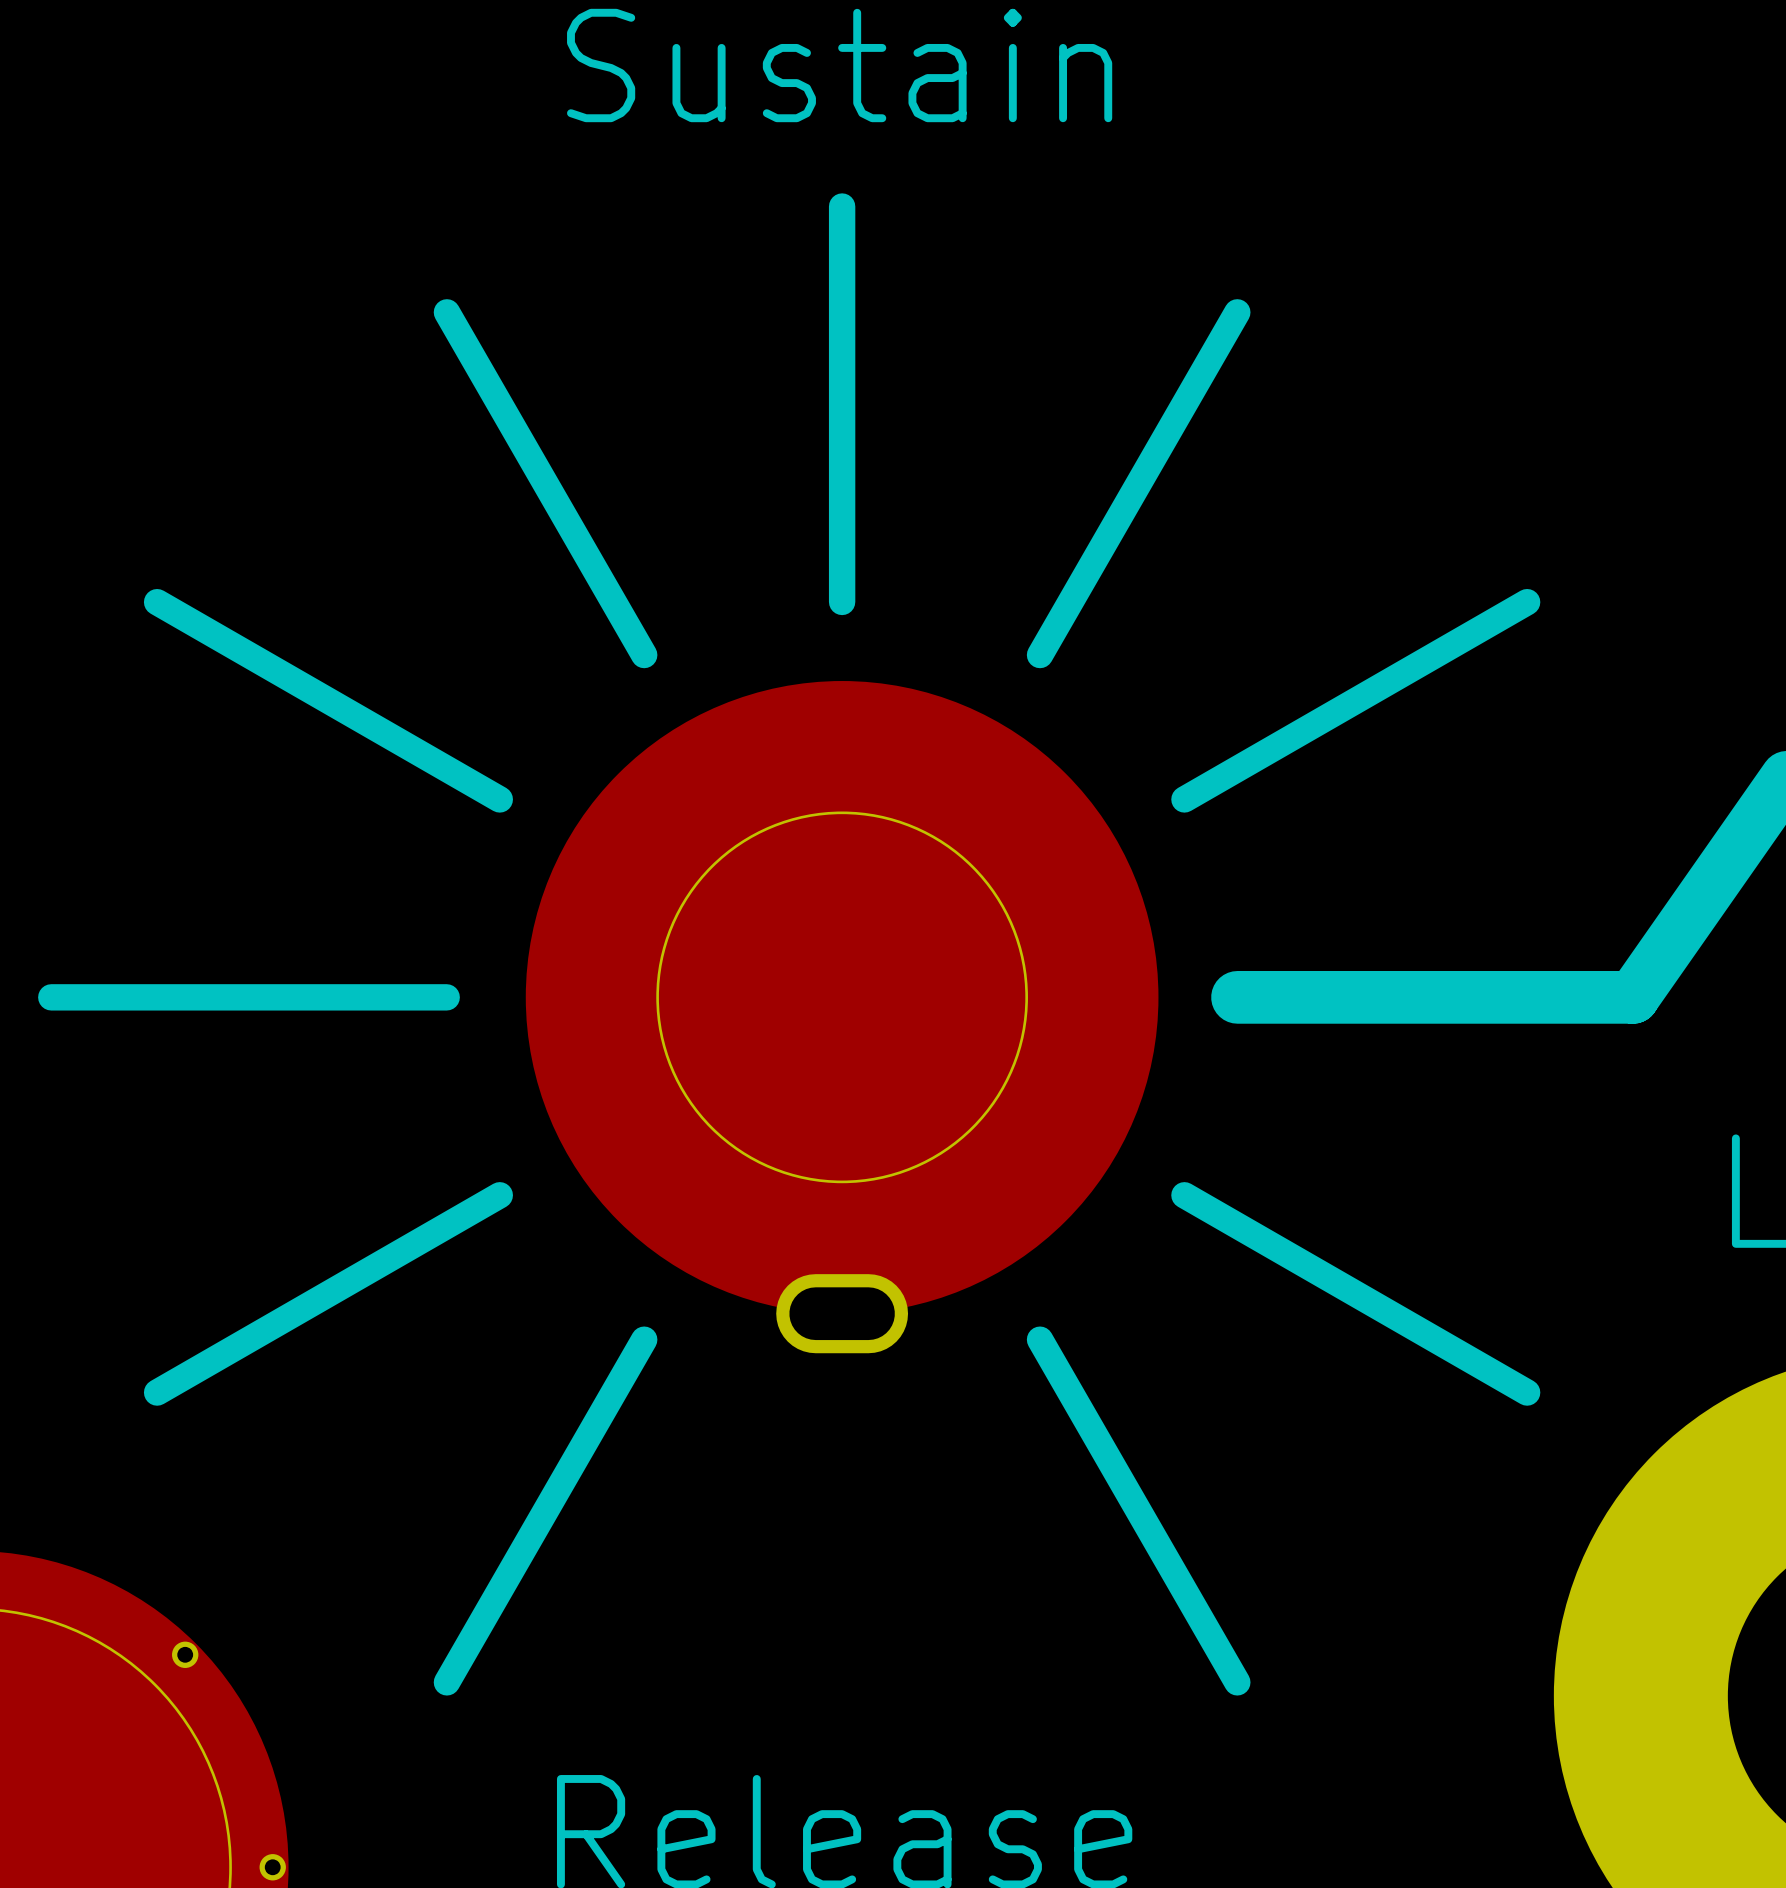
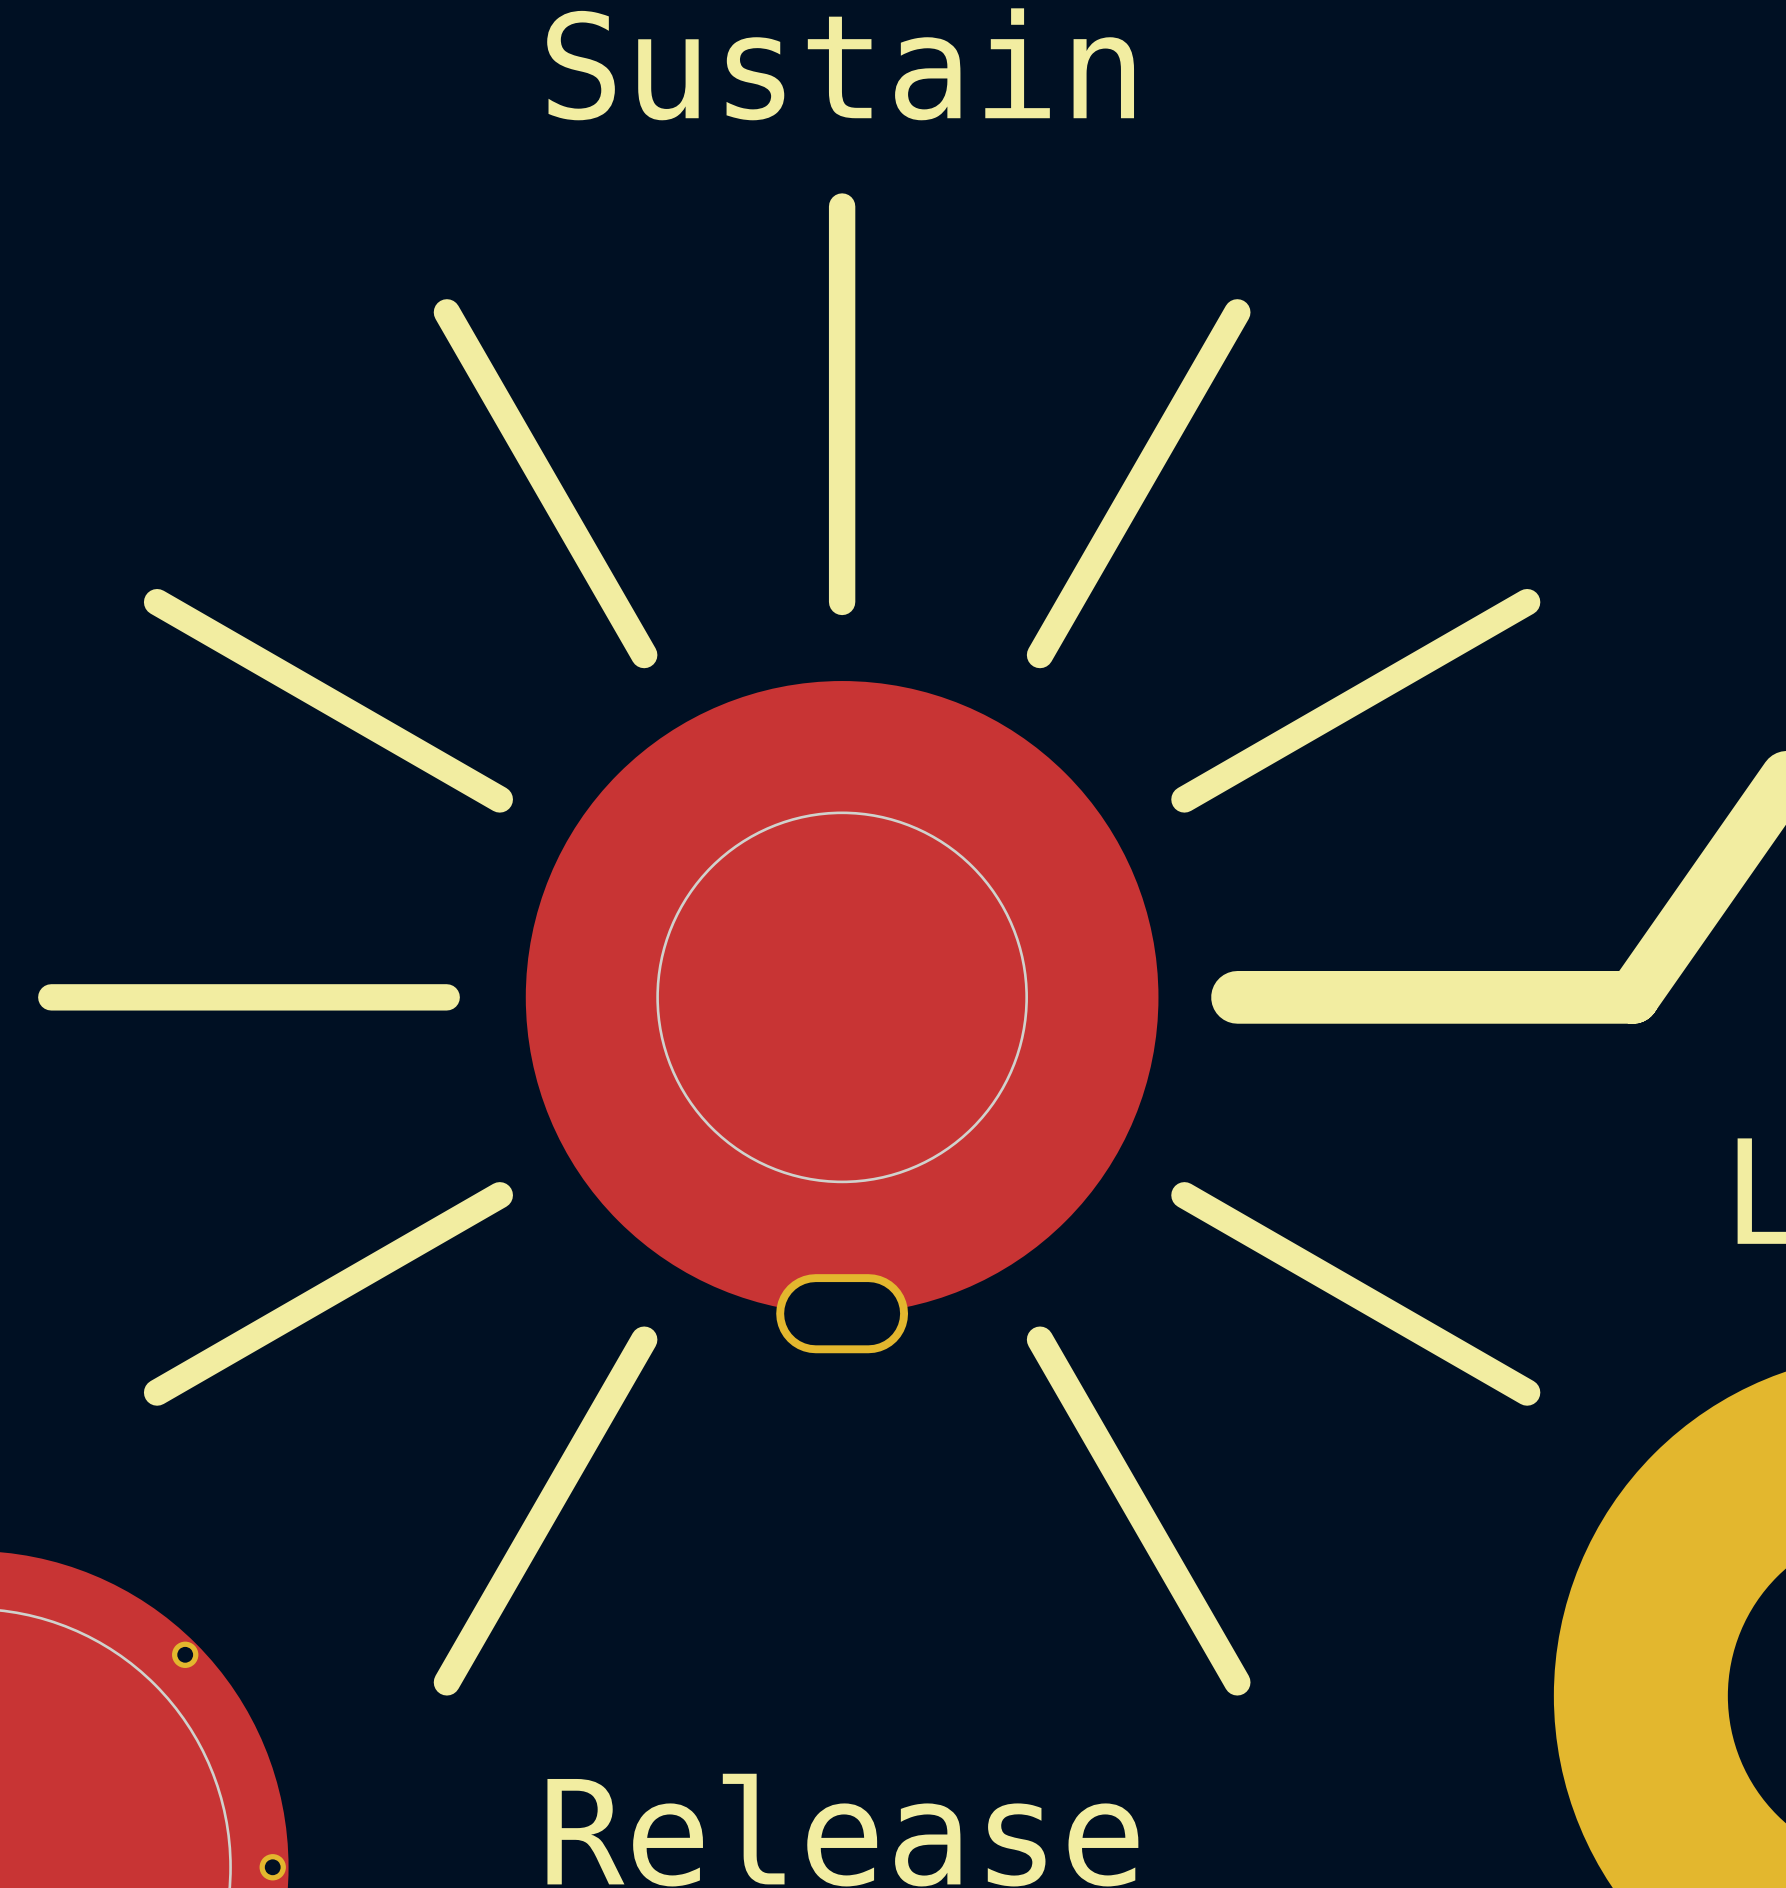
part footprint: [38, 193, 1647, 1696] -> [38, 193, 1647, 1696]

